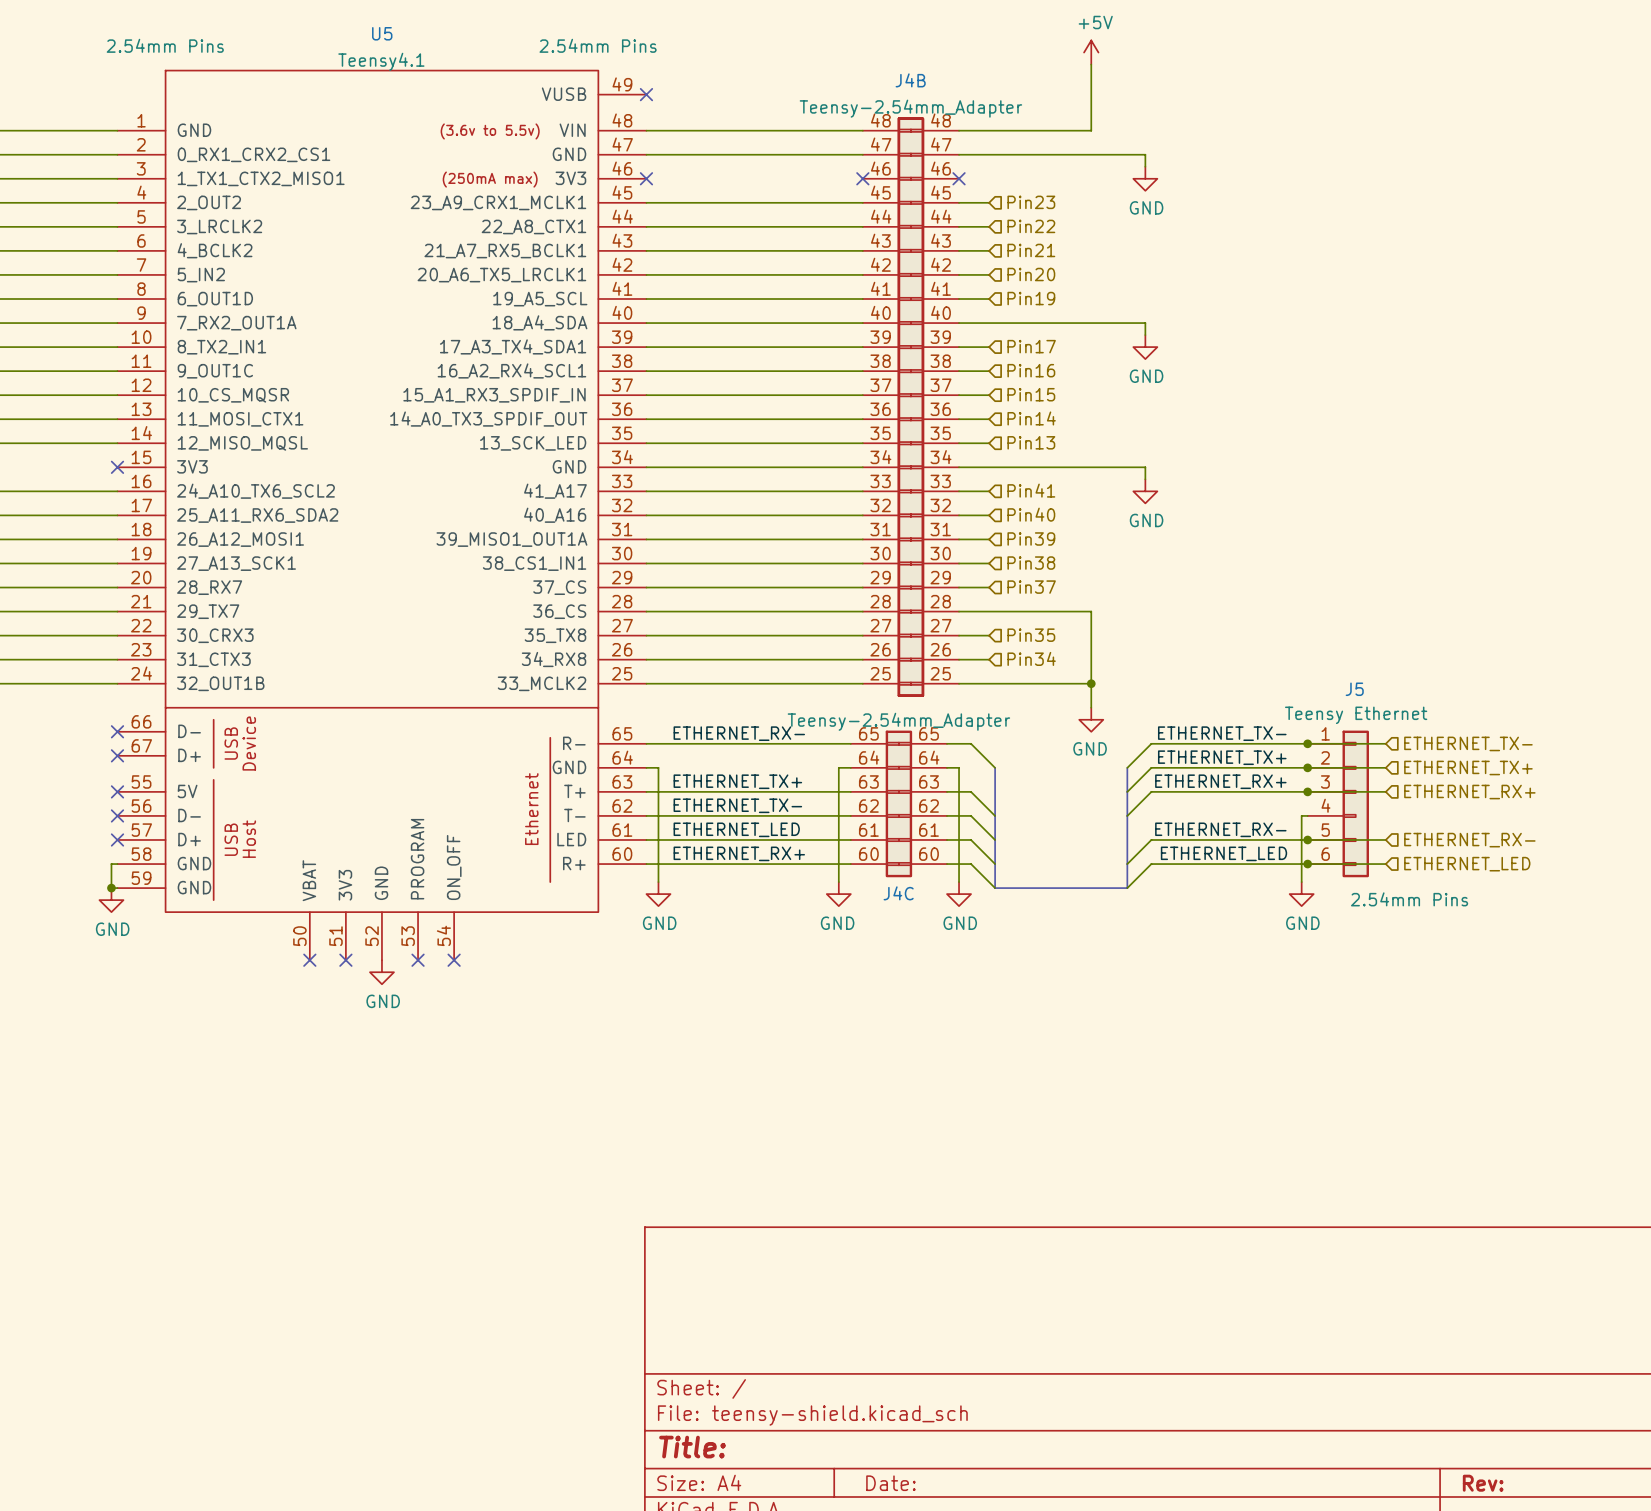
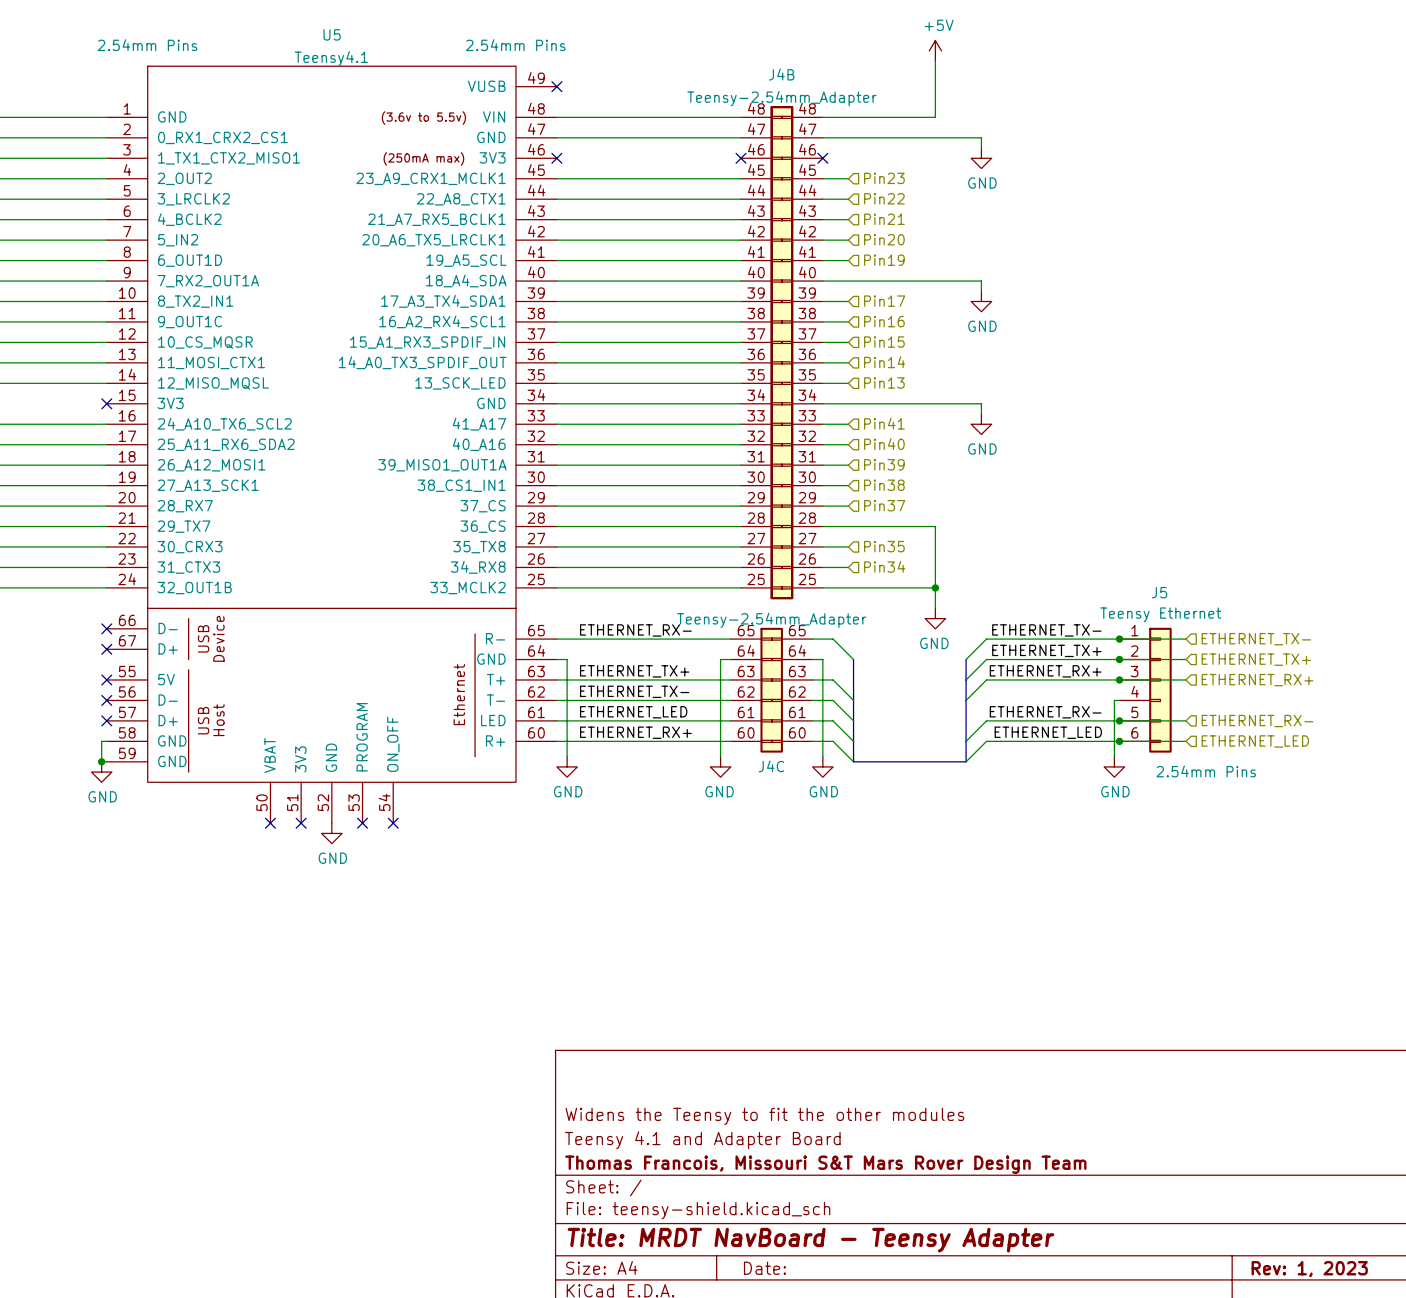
title block: none -> Widens the Teensy to fit the other modules (764, 1116)
title block: none -> Teensy 4.1 and Adapter Board (702, 1140)
title block: none -> Thomas Francois, Missouri S&T Mars Rover Design Team (825, 1164)
title block: Title: (692, 1447) -> Title: MRDT NavBoard - Teensy Adapter (810, 1240)
title block: Rev: (1483, 1483) -> Rev: 1, 2023 (1309, 1269)

